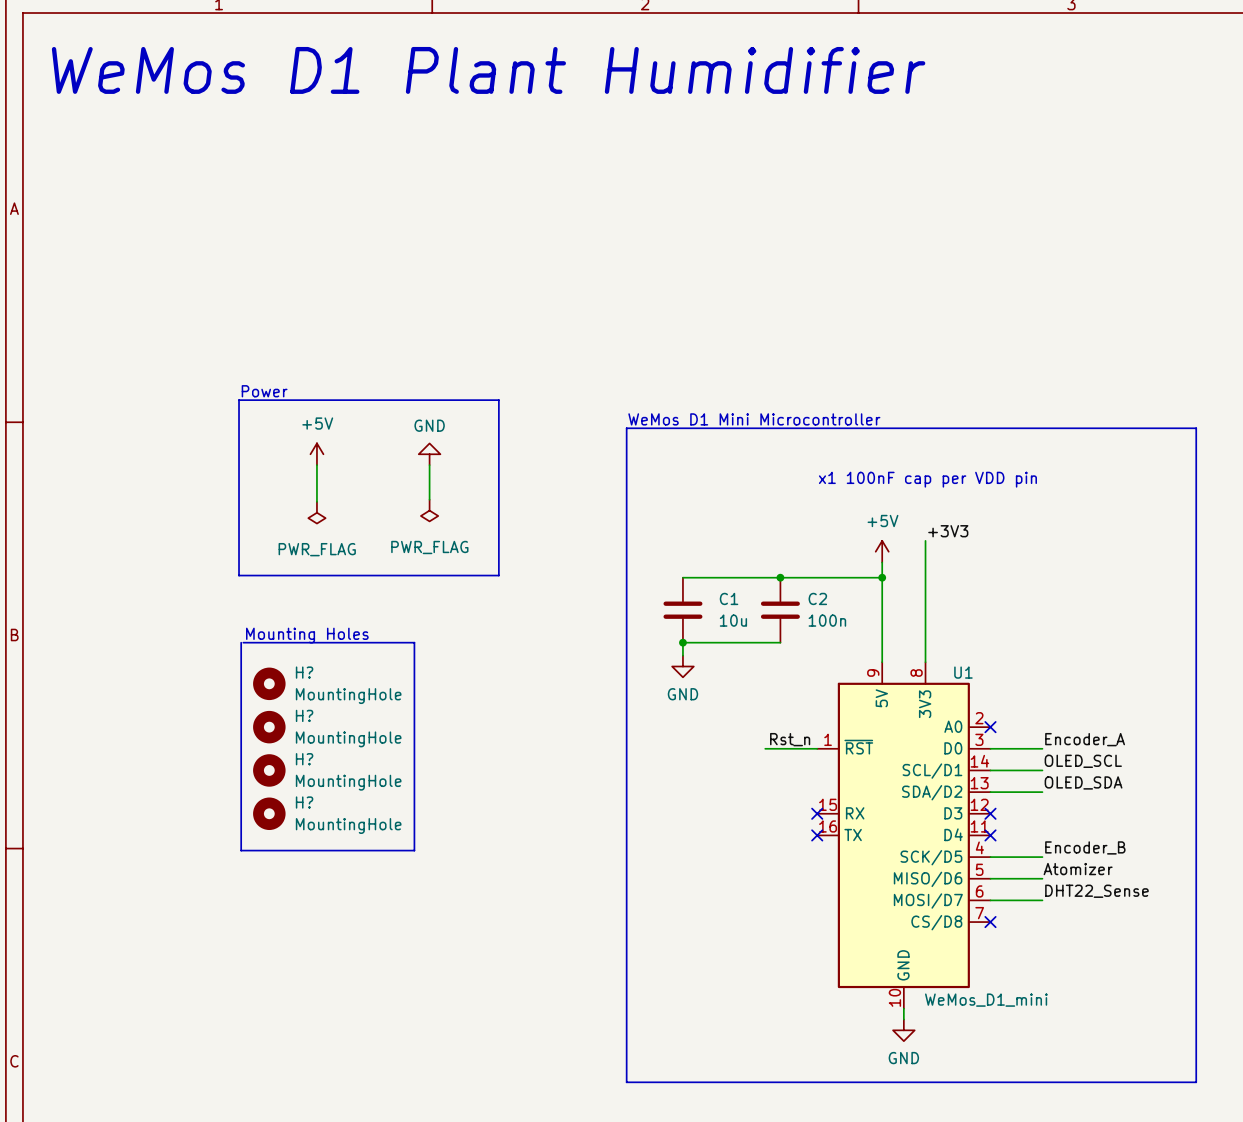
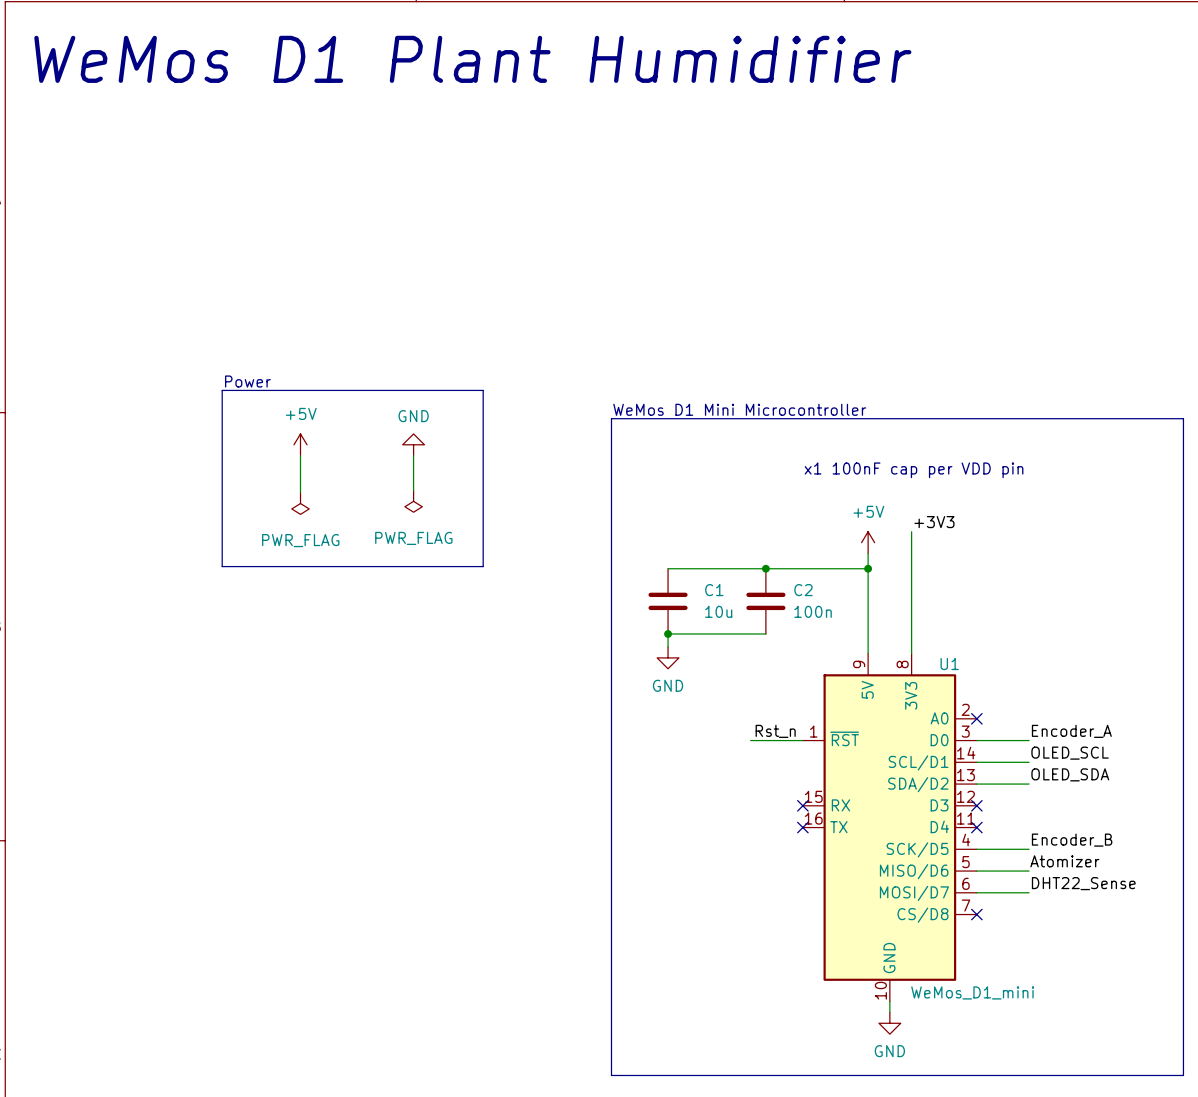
text: Mounting Holes (307, 635) -> none
line: (241, 642) (241, 850) (414, 850) (414, 642) (243, 642) -> none
H?: MountingHole (269, 683) -> none
H?: MountingHole (269, 727) -> none
H?: MountingHole (269, 770) -> none
H?: MountingHole (269, 813) -> none

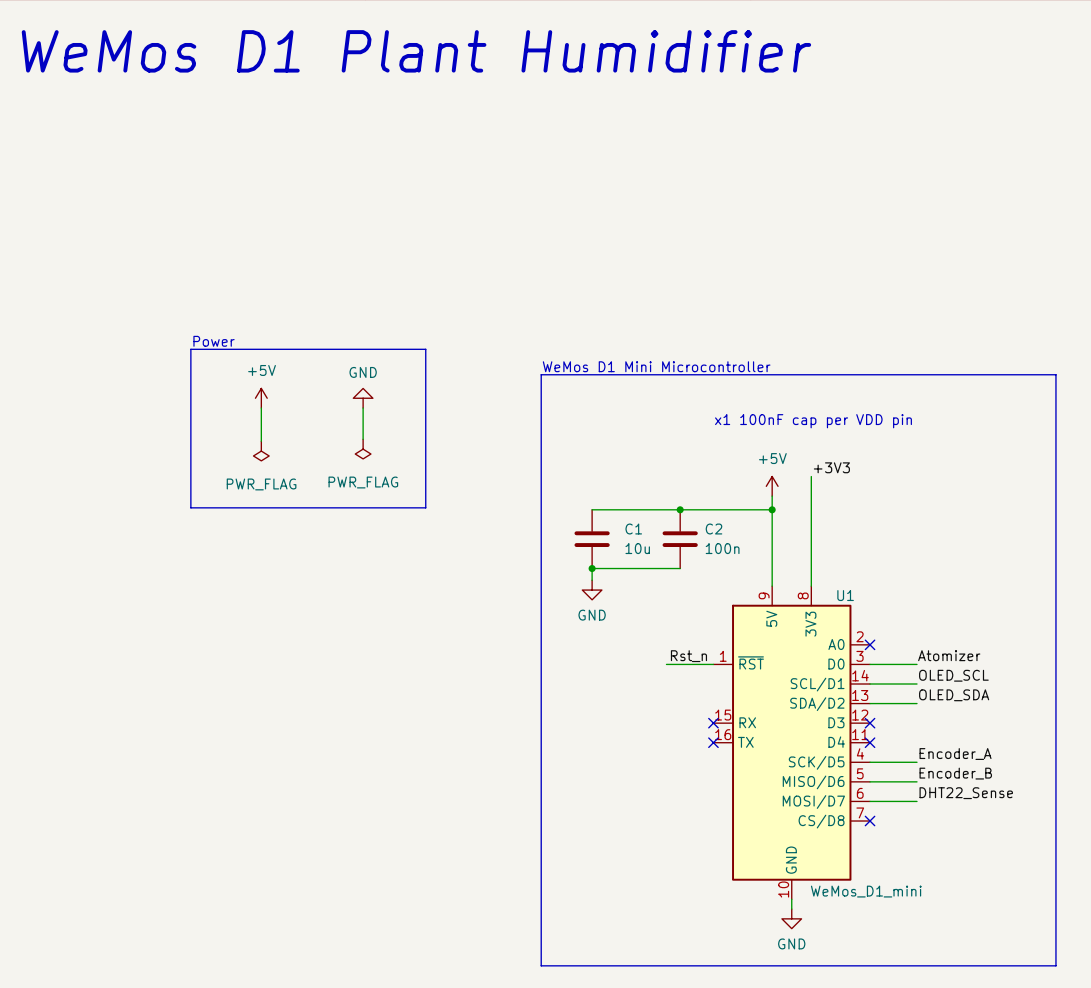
label: Encoder_A (1071, 731) -> Atomizer (949, 655)
label: Encoder_B (1072, 840) -> Encoder_A (955, 754)
label: Atomizer (1064, 861) -> Encoder_B (955, 773)

